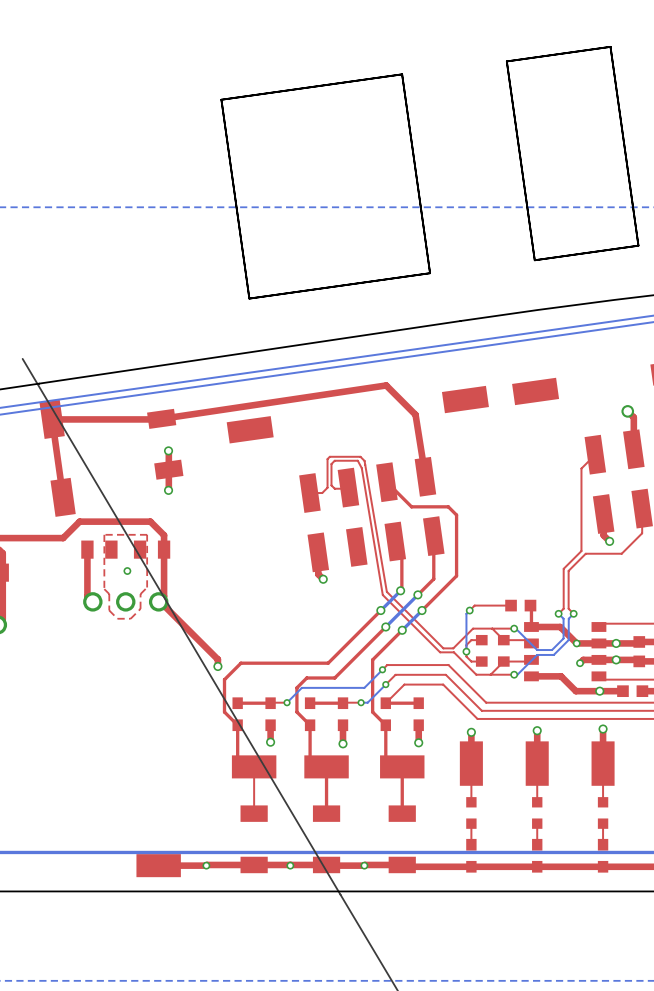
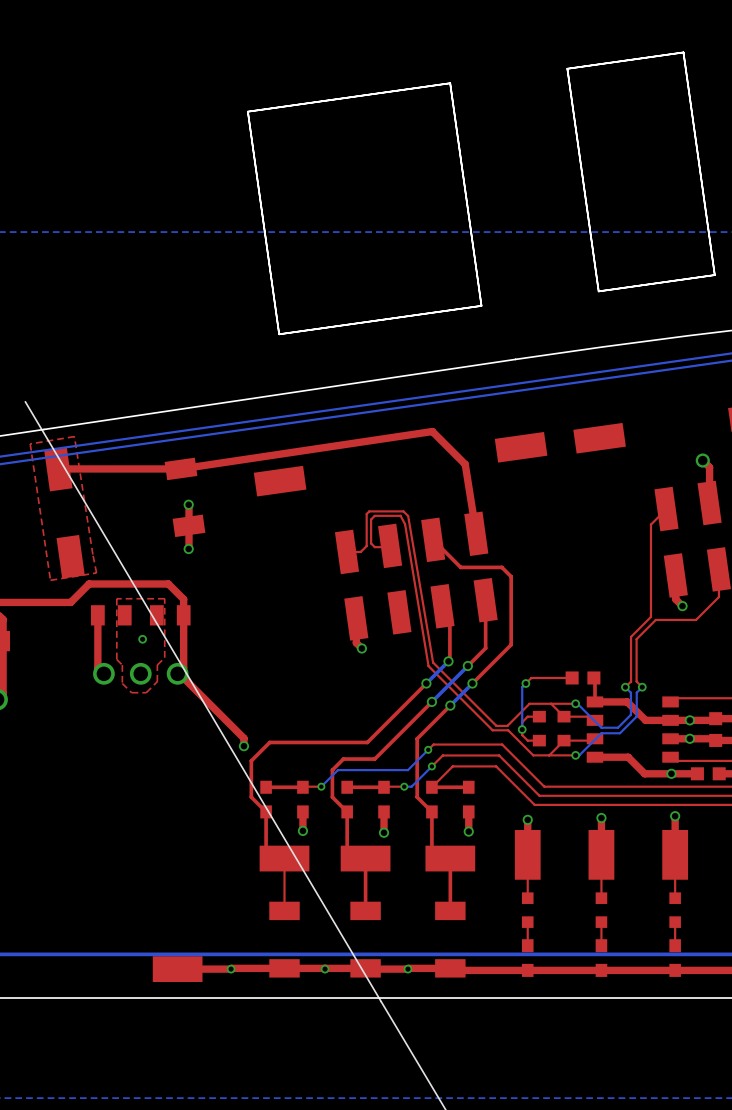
top zone outline: none -> (74, 436) (96, 572) (50, 580) (30, 443) (74, 436)
top track: (161, 418) (52, 419) (63, 497) -> (181, 468) (58, 469)
via: (576, 643) -> none
top track: (598, 659) (583, 659) (580, 663) -> none
via: (580, 663) -> none

